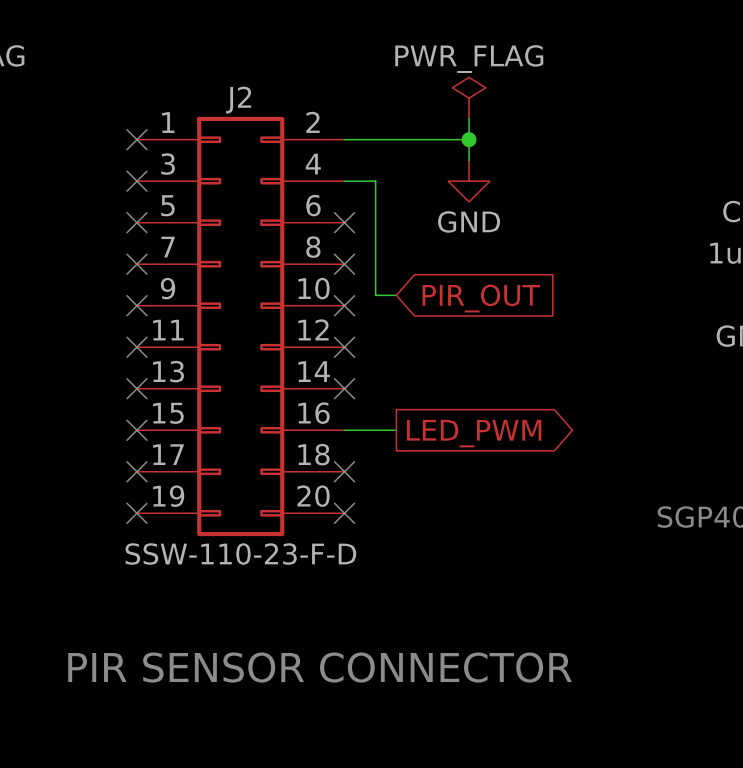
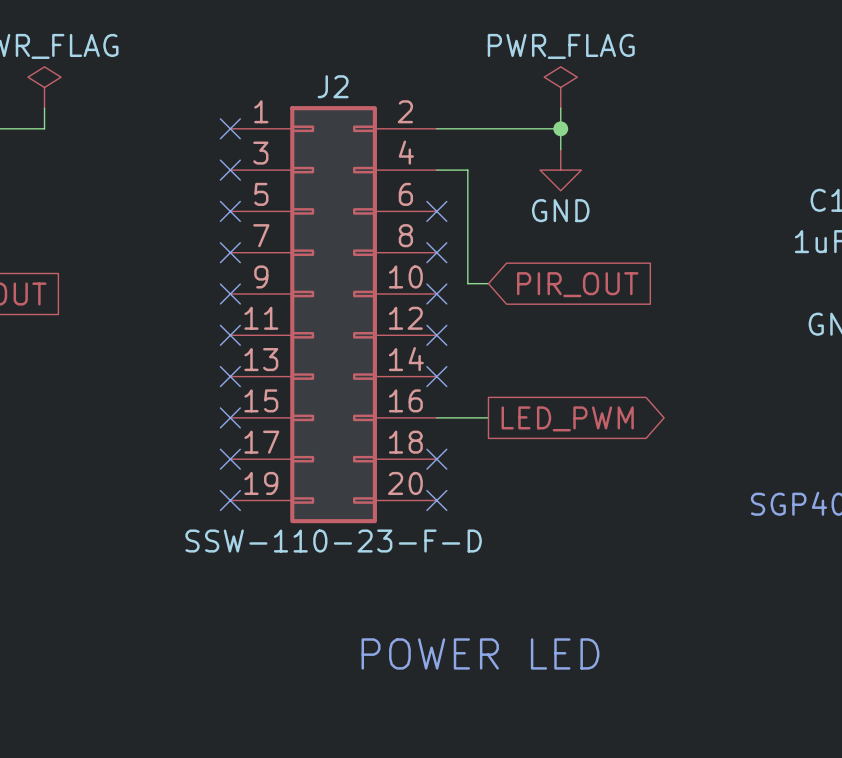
text: PIR SENSOR CONNECTOR (320, 667) -> none
text: none -> POWER LED (480, 653)

